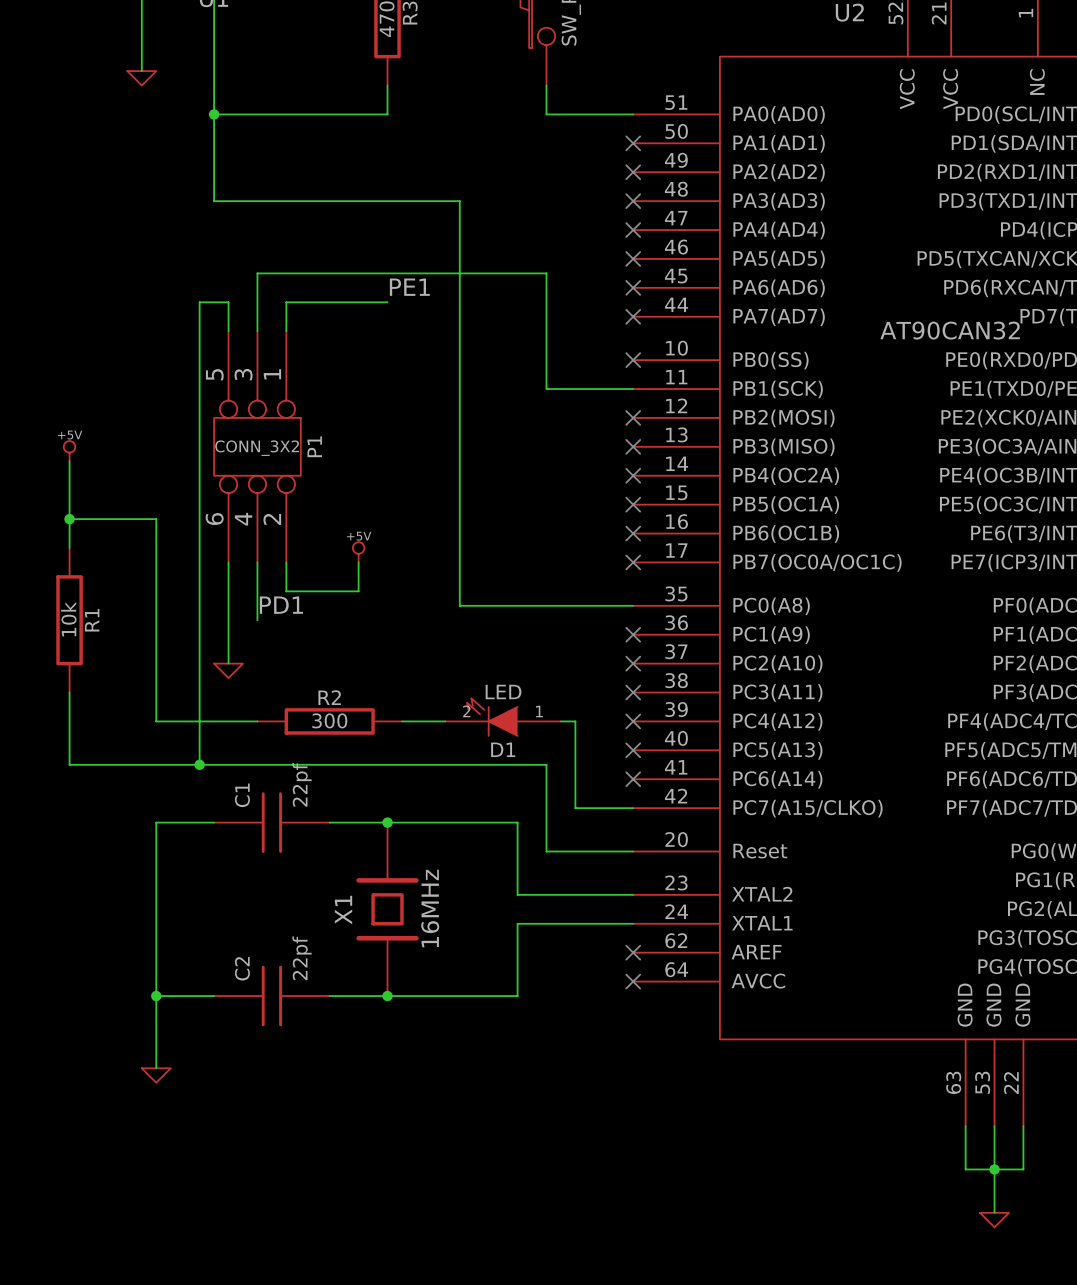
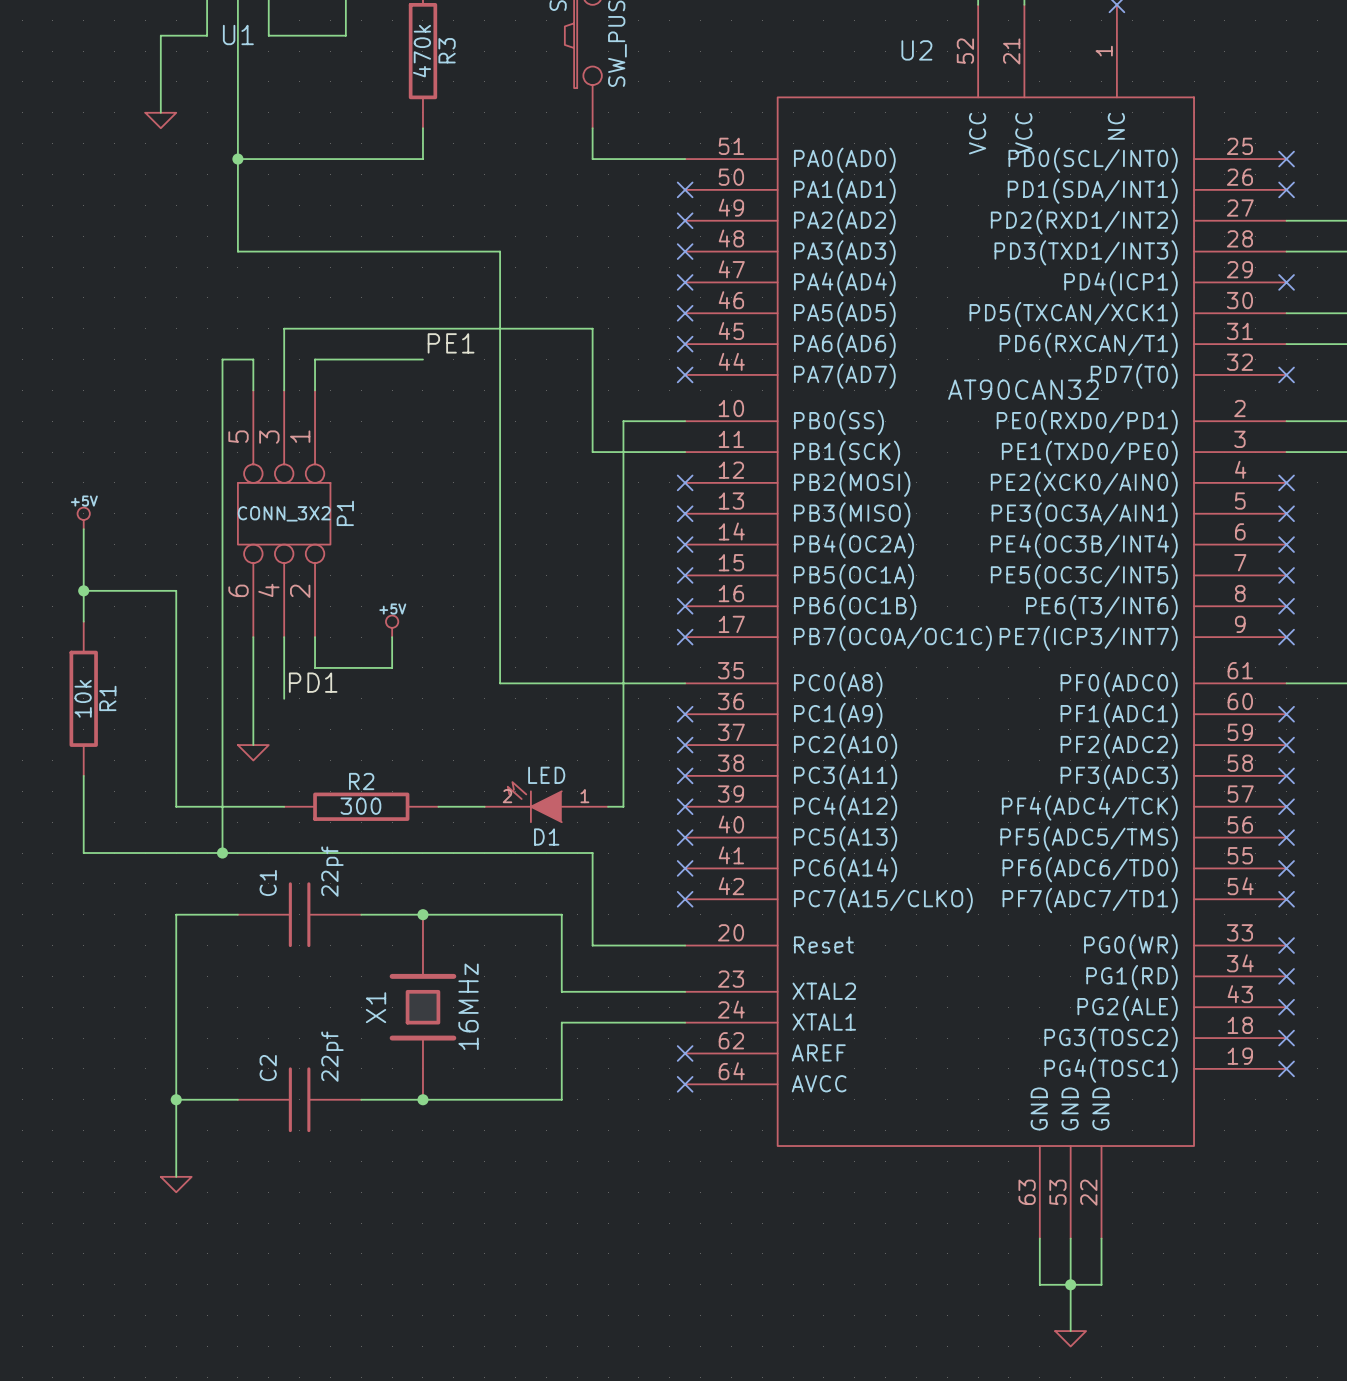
no-connect mark: (633, 360) -> none
wire: (575, 721) (575, 808) (633, 808) -> (623, 806) (623, 421) (685, 421)
no-connect mark: none -> (685, 899)

